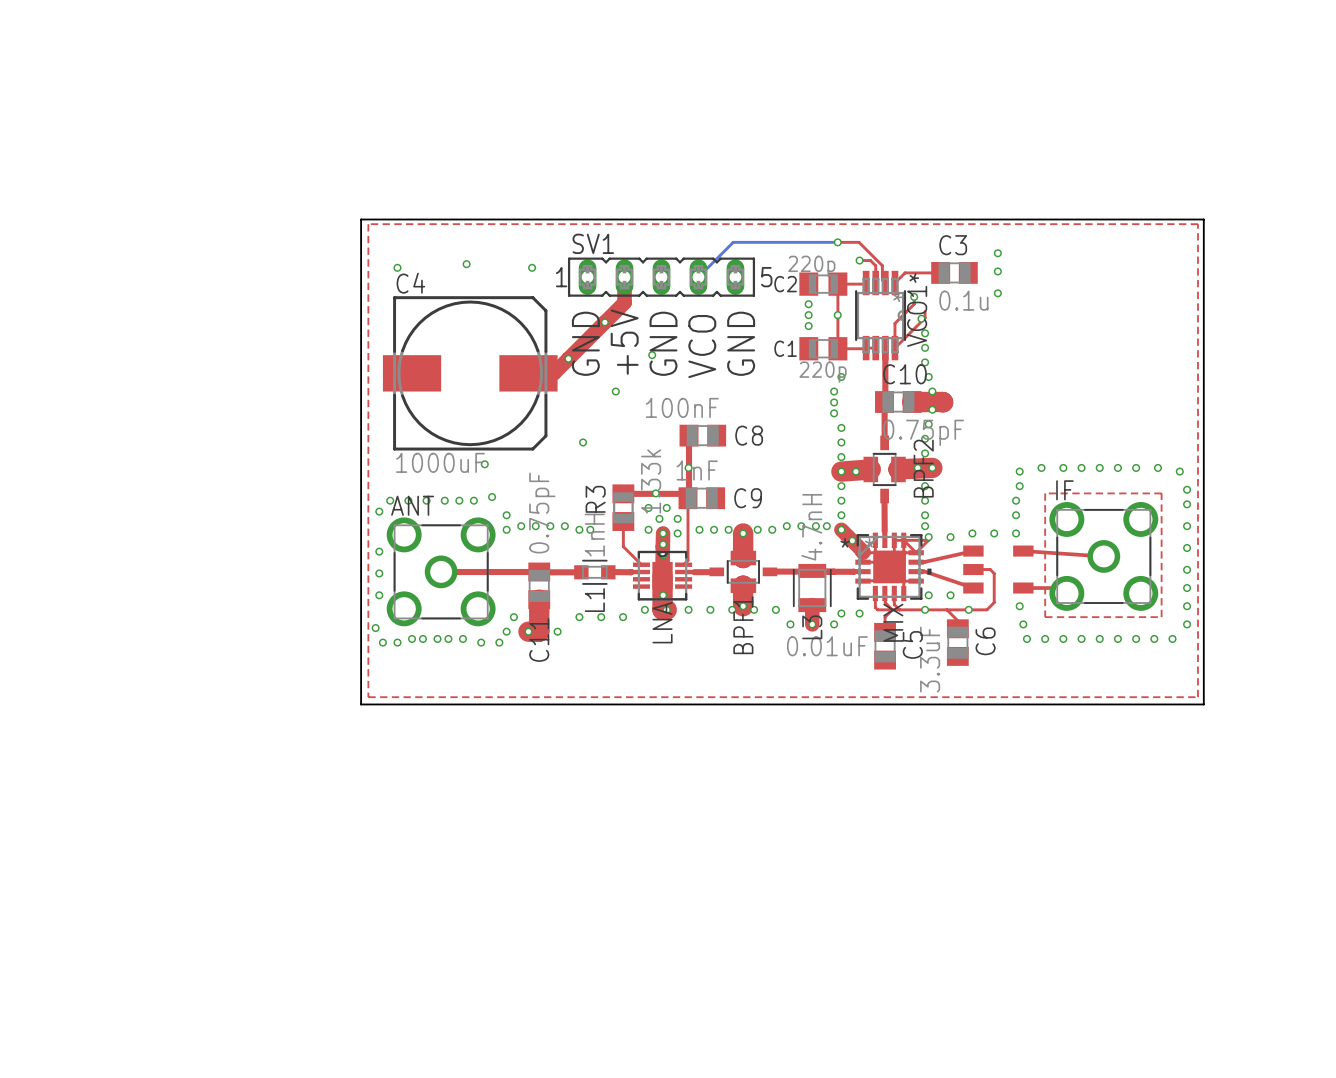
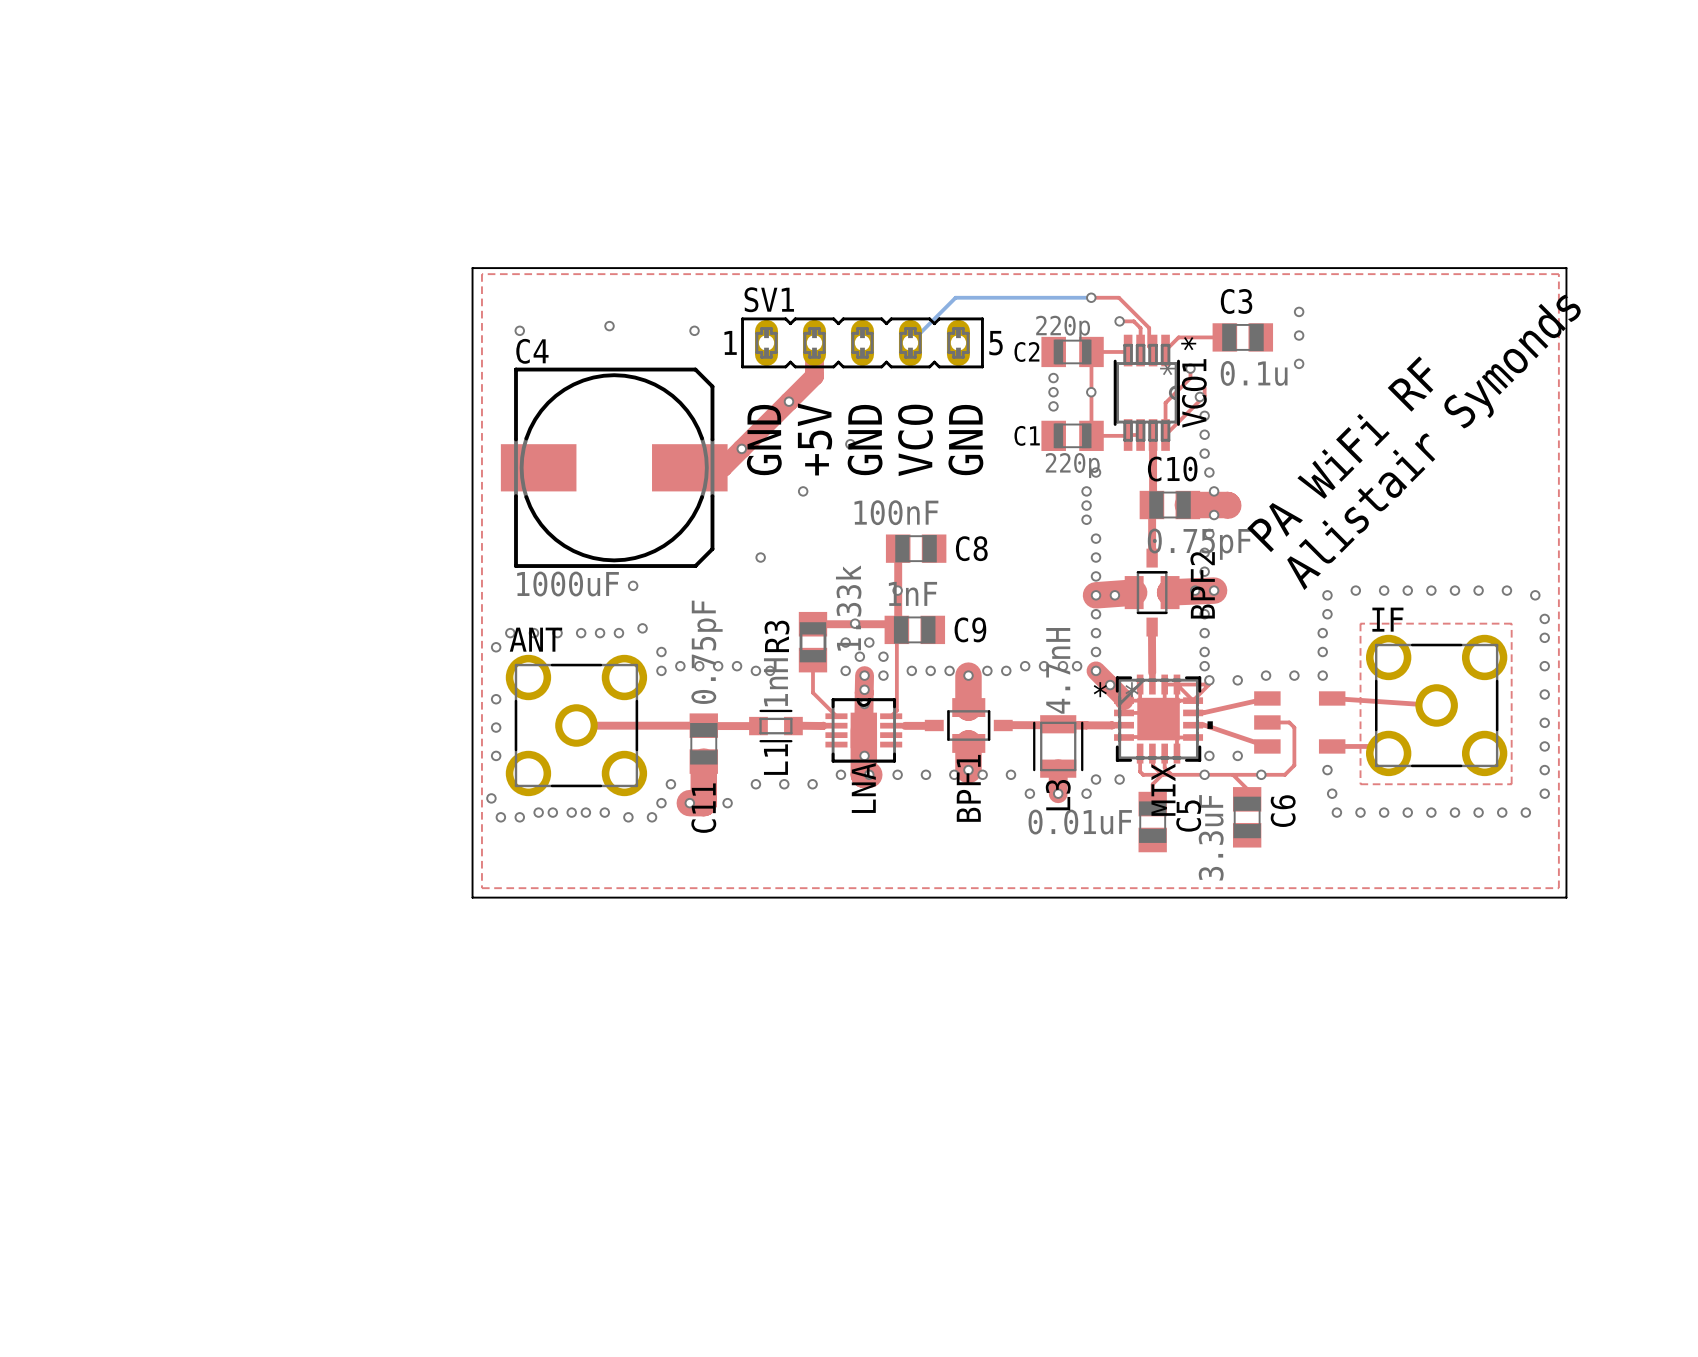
text: none -> Alistair Symonds (1434, 442)
text: none -> PA WiFi RF (1340, 454)

